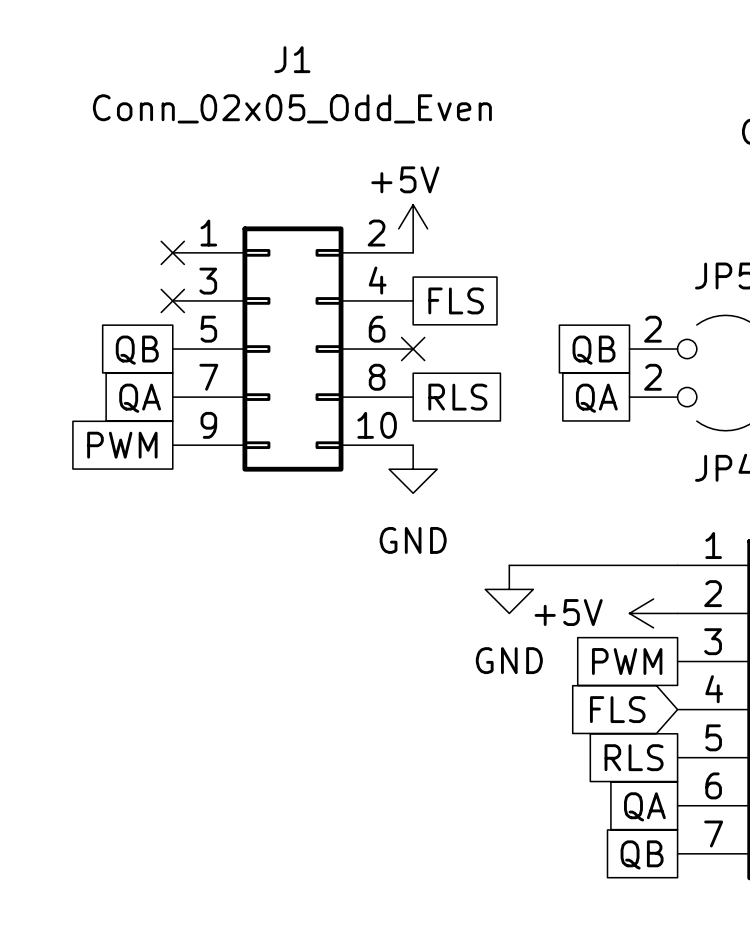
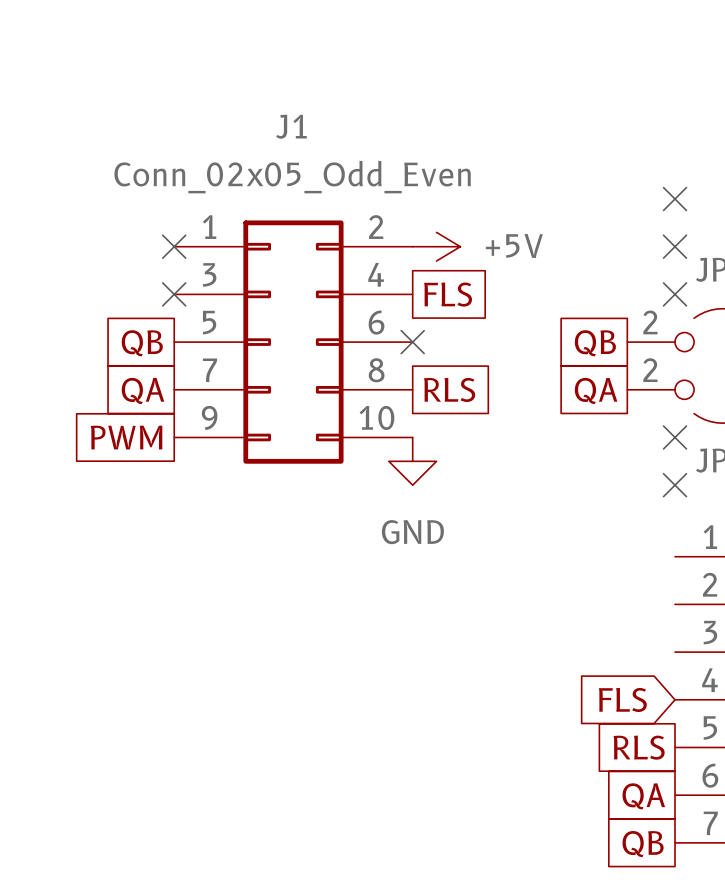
J1 name position: J1 (292, 59) -> J1 (291, 126)
J1 value position: Conn_02x05_Odd_Even (292, 108) -> Conn_02x05_Odd_Even (292, 177)
power symbol text position: +5V (405, 179) -> +5V (514, 245)
no-connect mark: none -> (675, 199)
power symbol rotation: 0° (413, 228) -> 90° clockwise (436, 246)
power symbol position: +5V (413, 228) -> +5V (436, 246)
no-connect mark: none -> (675, 246)
no-connect mark: none -> (675, 294)
no-connect mark: none -> (675, 437)
no-connect mark: none -> (675, 485)
wire: (509, 565) (677, 565) -> none
power symbol: GND (509, 589) -> none
power symbol: +5V (653, 613) -> none
global label: PWM (627, 661) -> none

